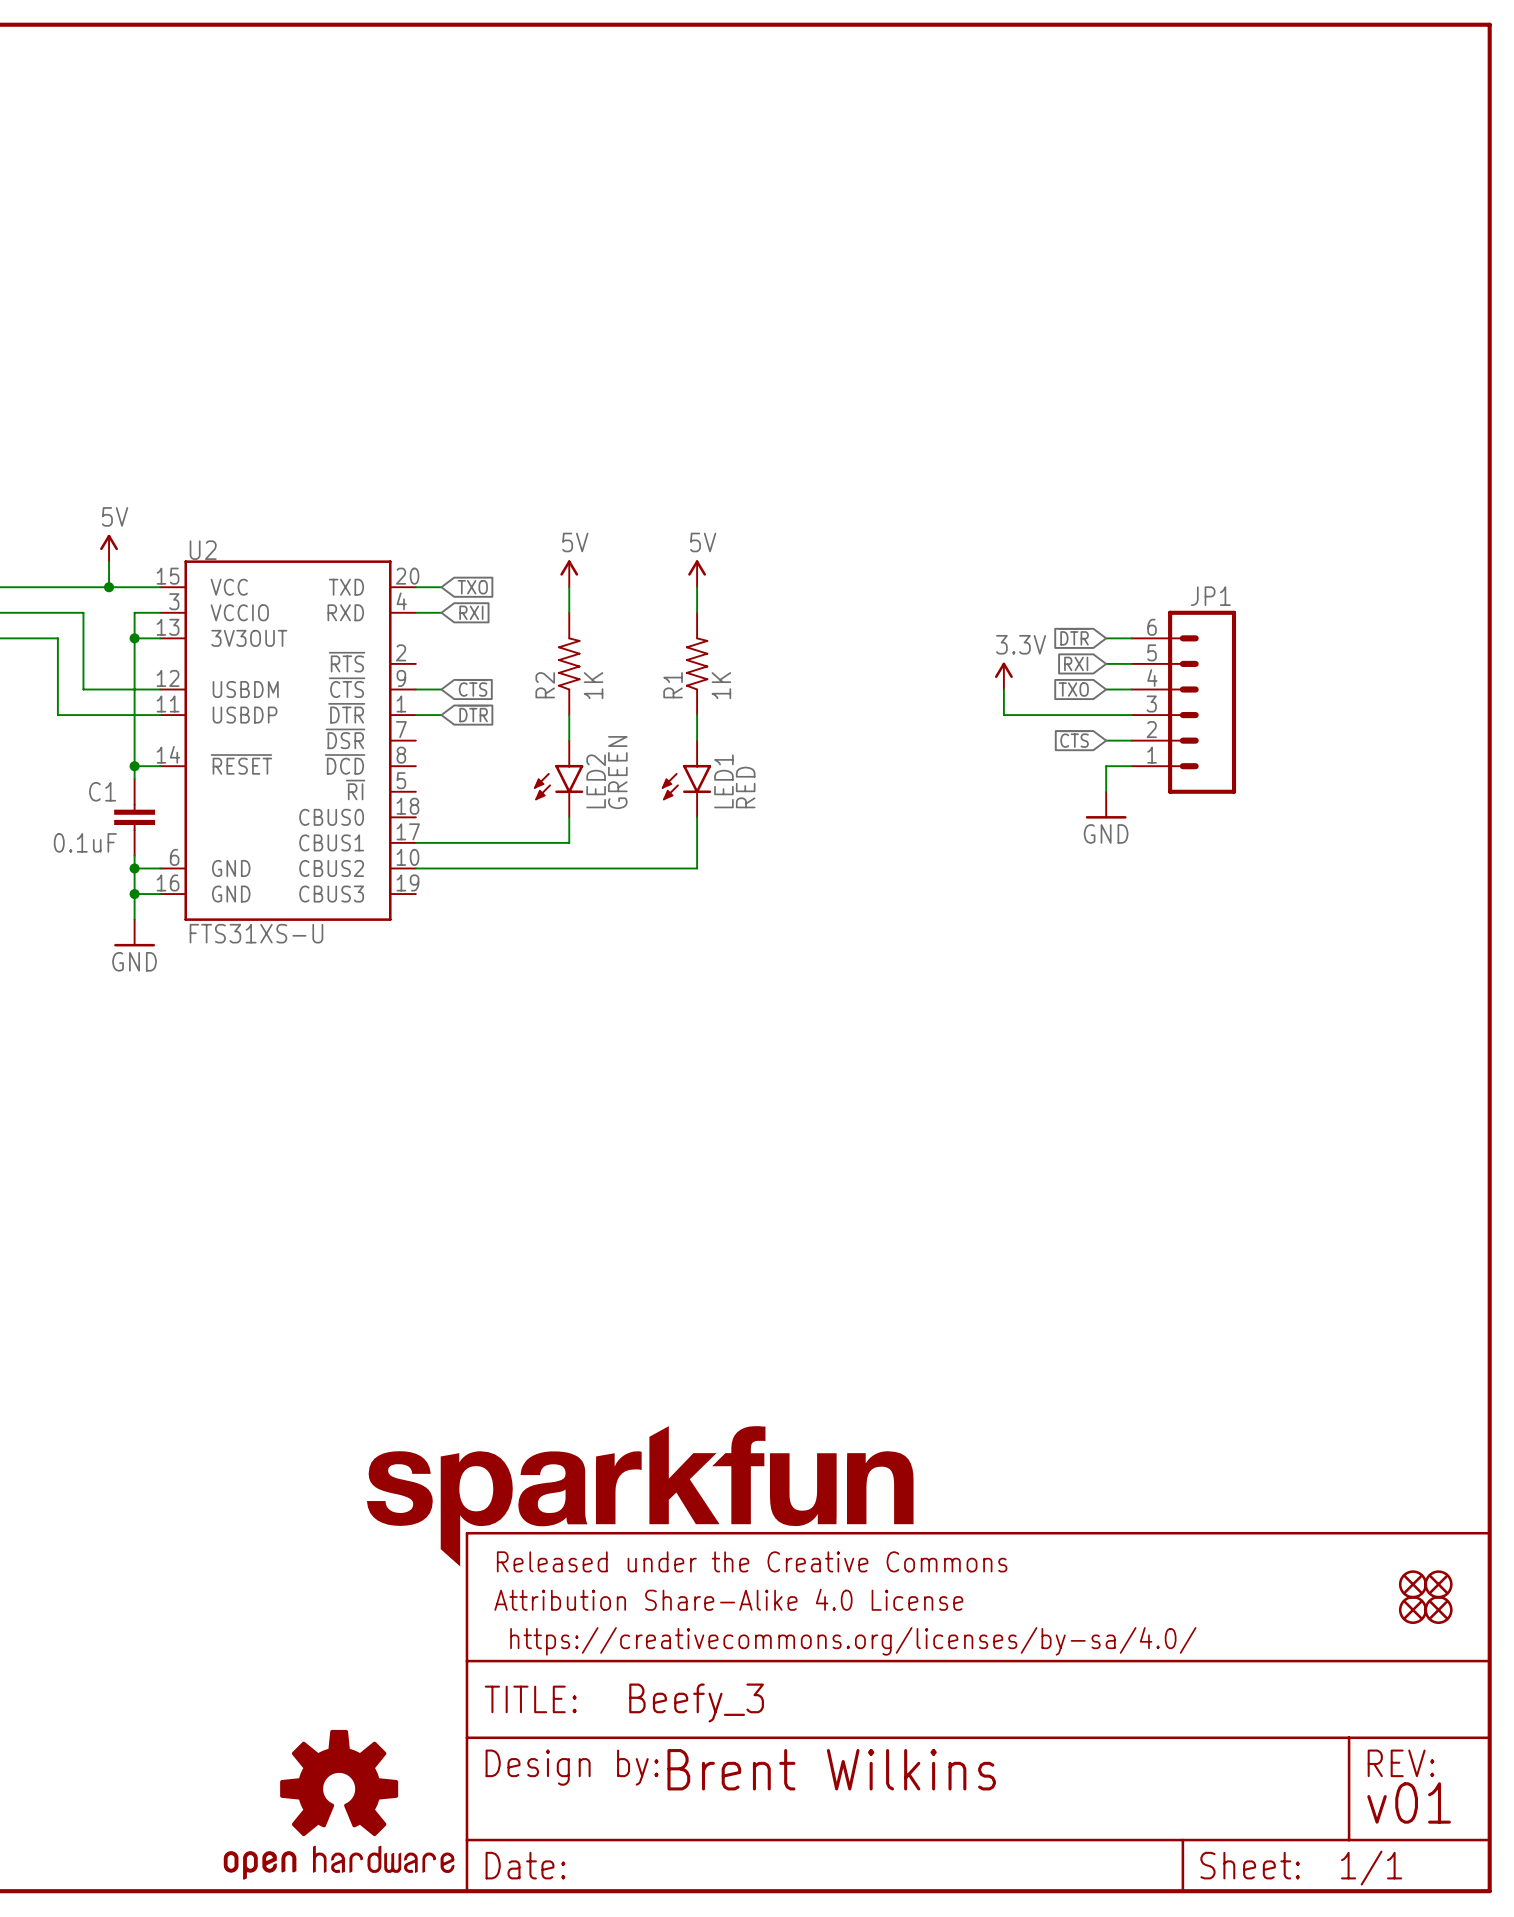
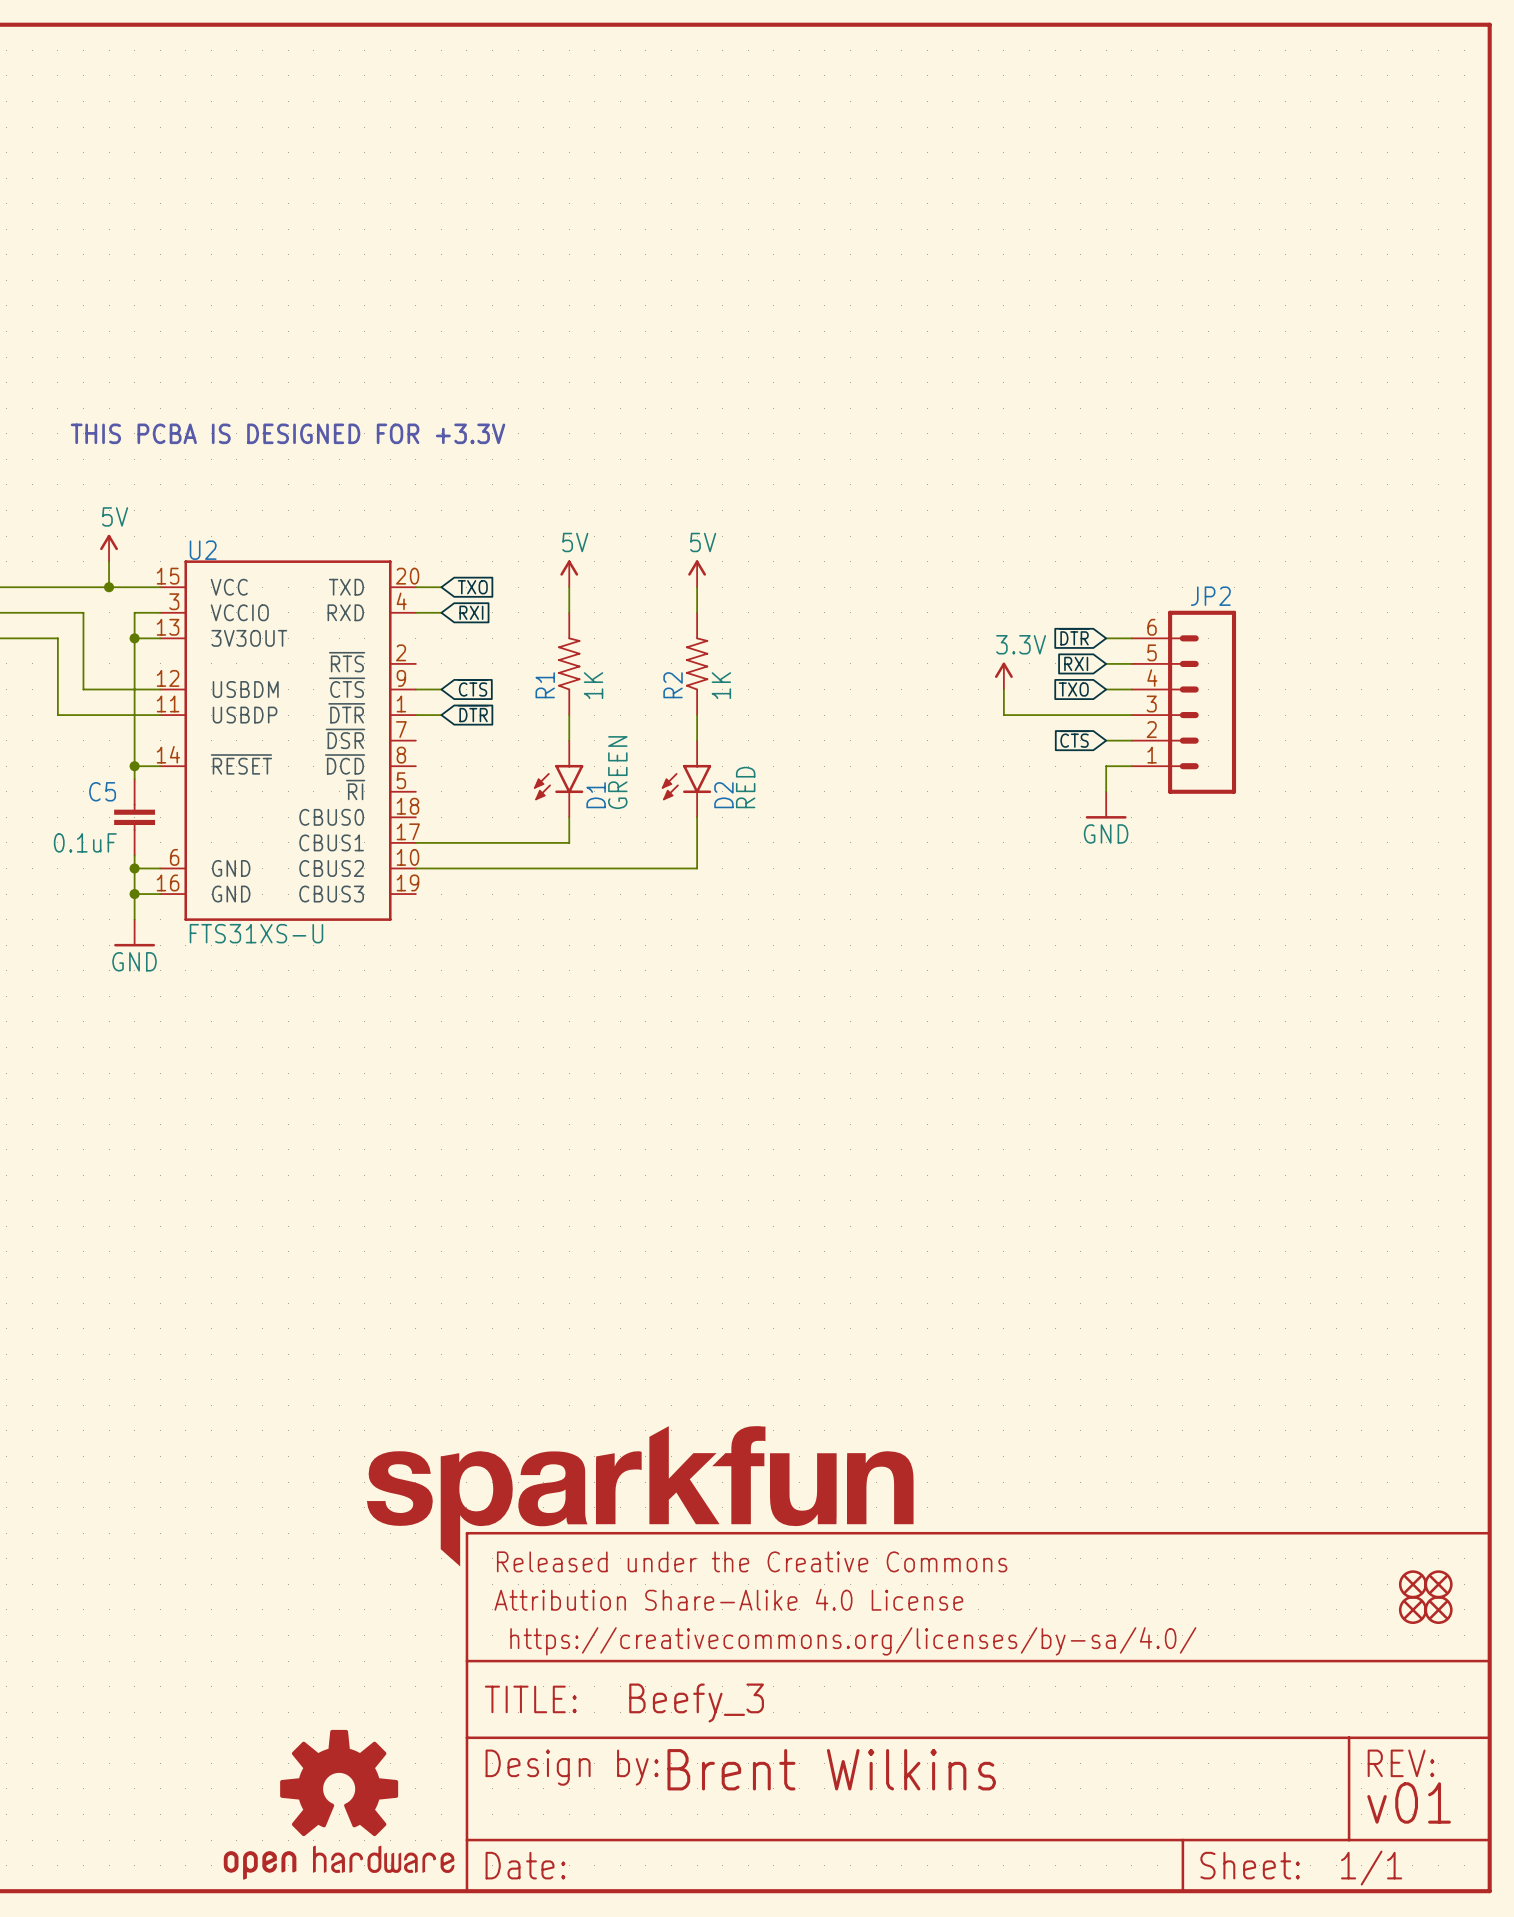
text: none -> THIS PCBA IS DESIGNED FOR +3.3V (288, 433)
JP1 name: JP1 (1210, 596) -> JP2 (1210, 596)
R2 name: R2 (545, 685) -> R1 (545, 685)
R1 name: R1 (673, 685) -> R2 (673, 685)
LED2 name: LED2 (596, 781) -> D1 (596, 795)
LED1 name: LED1 (723, 781) -> D2 (723, 795)
C1 name: C1 (102, 791) -> C5 (102, 791)

